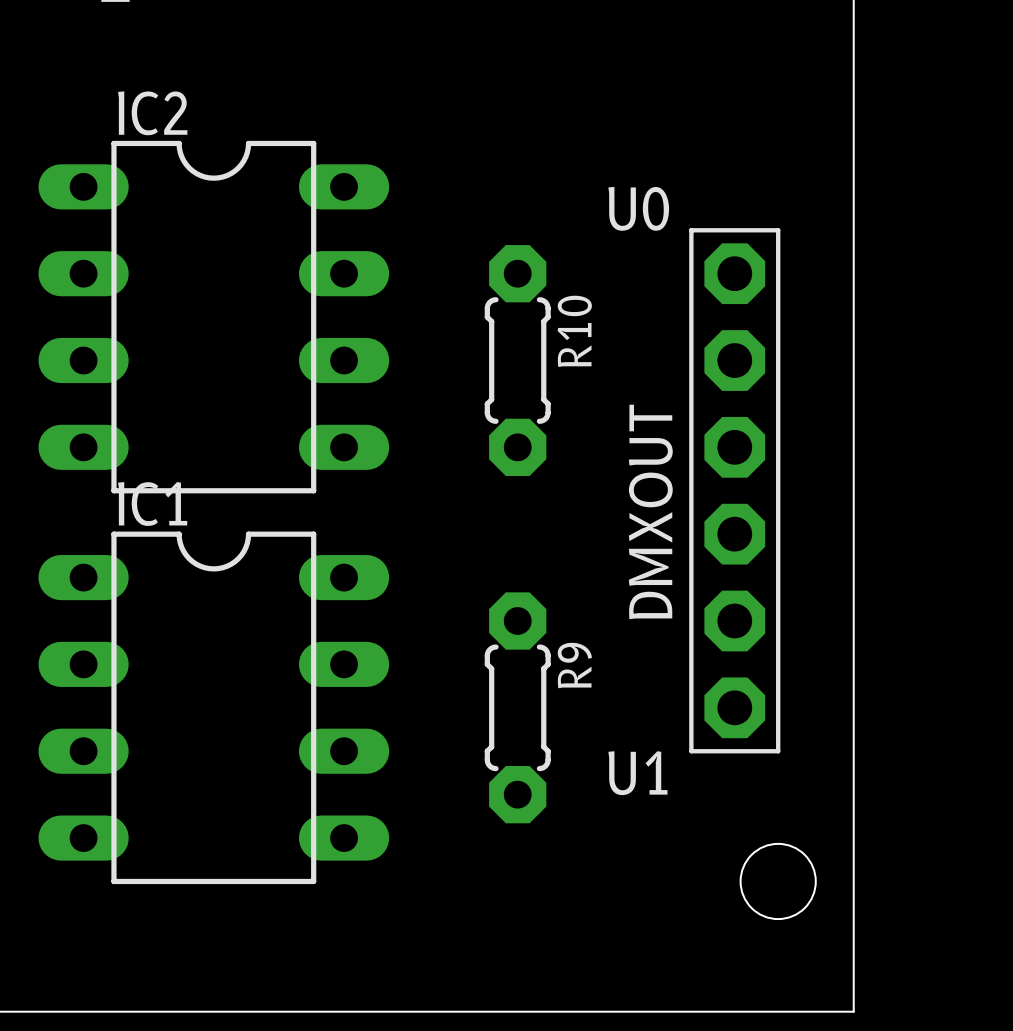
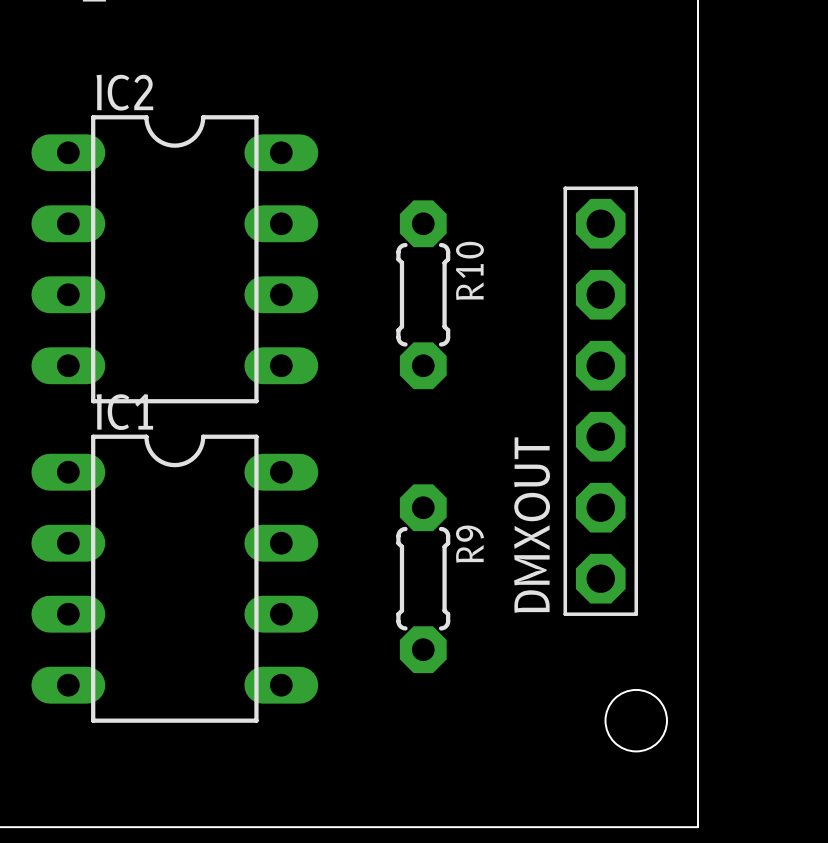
text: U0 (638, 208) -> none
DMXOUT name position: DMXOUT (650, 511) -> DMXOUT (532, 525)
text: U1 (637, 773) -> none

